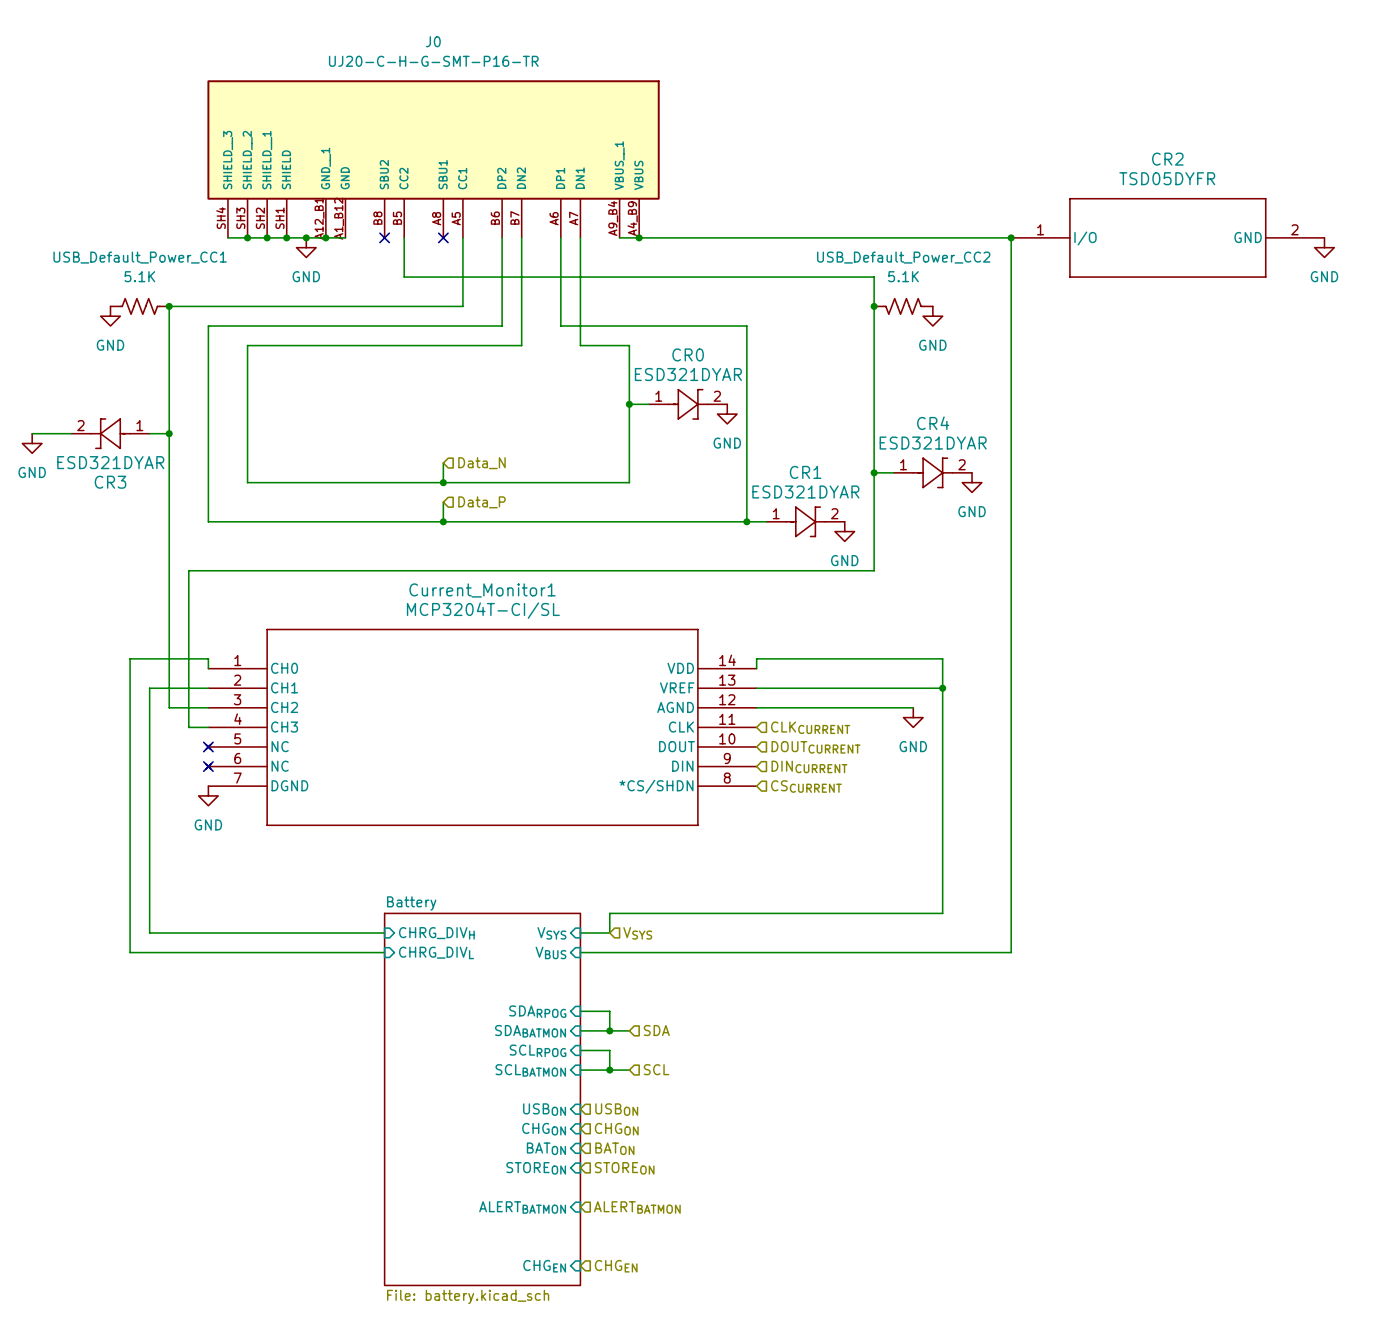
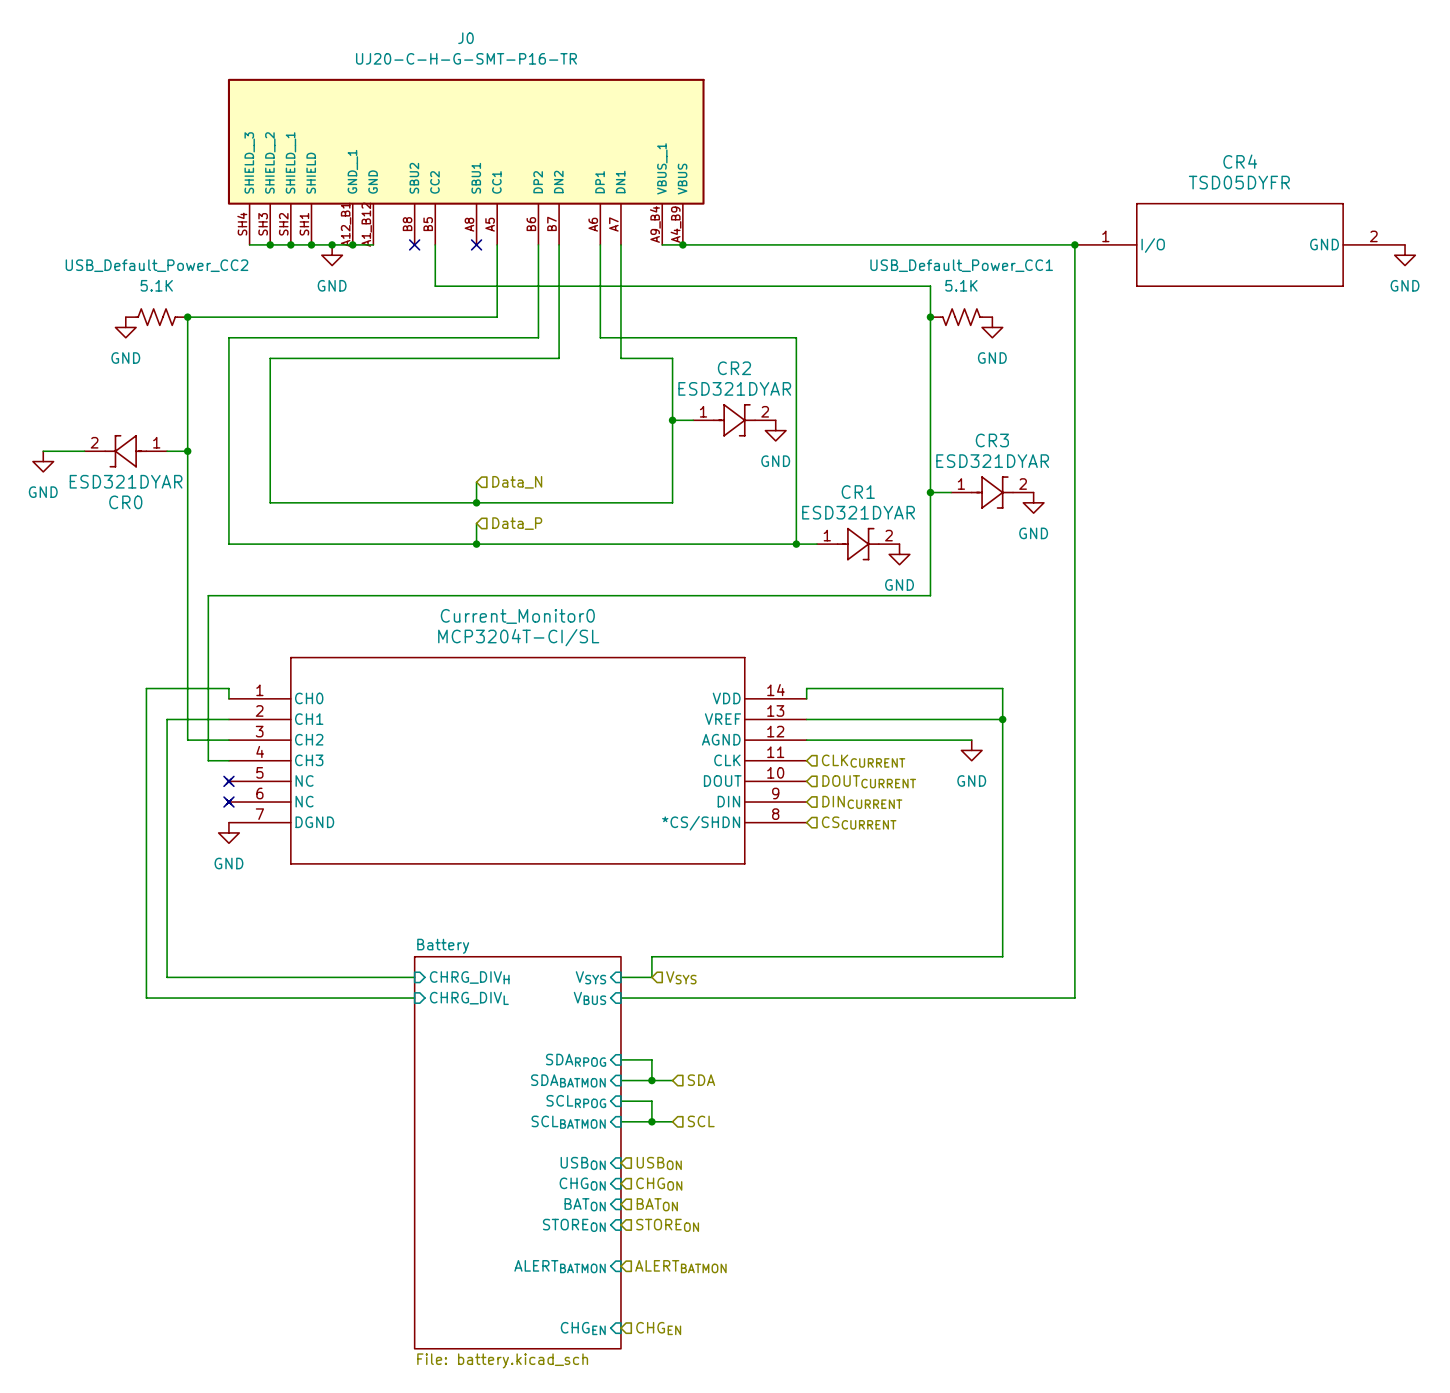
CR2 name: CR2 (1167, 159) -> CR4 (1240, 161)
USB_Default_Power_CC1 name: USB_Default_Power_CC1 (140, 257) -> USB_Default_Power_CC2 (156, 265)
USB_Default_Power_CC2 name: USB_Default_Power_CC2 (903, 257) -> USB_Default_Power_CC1 (961, 265)
CR0 name: CR0 (688, 354) -> CR2 (734, 368)
CR4 name: CR4 (933, 423) -> CR3 (992, 440)
CR3 name: CR3 (110, 482) -> CR0 (125, 502)
Current_Monitor1 name: Current_Monitor1 (482, 590) -> Current_Monitor0 (517, 616)

